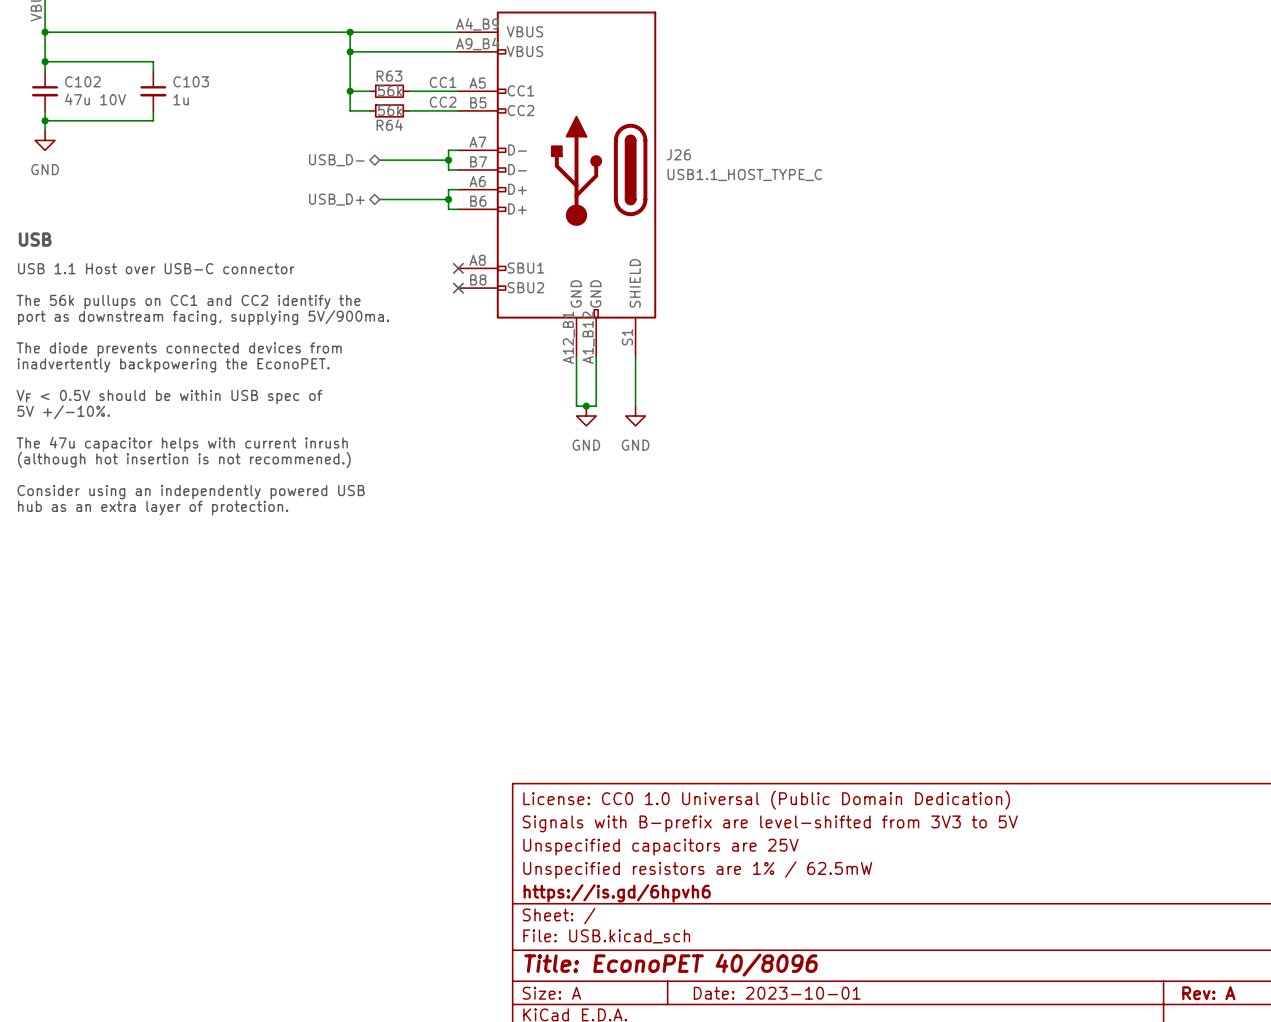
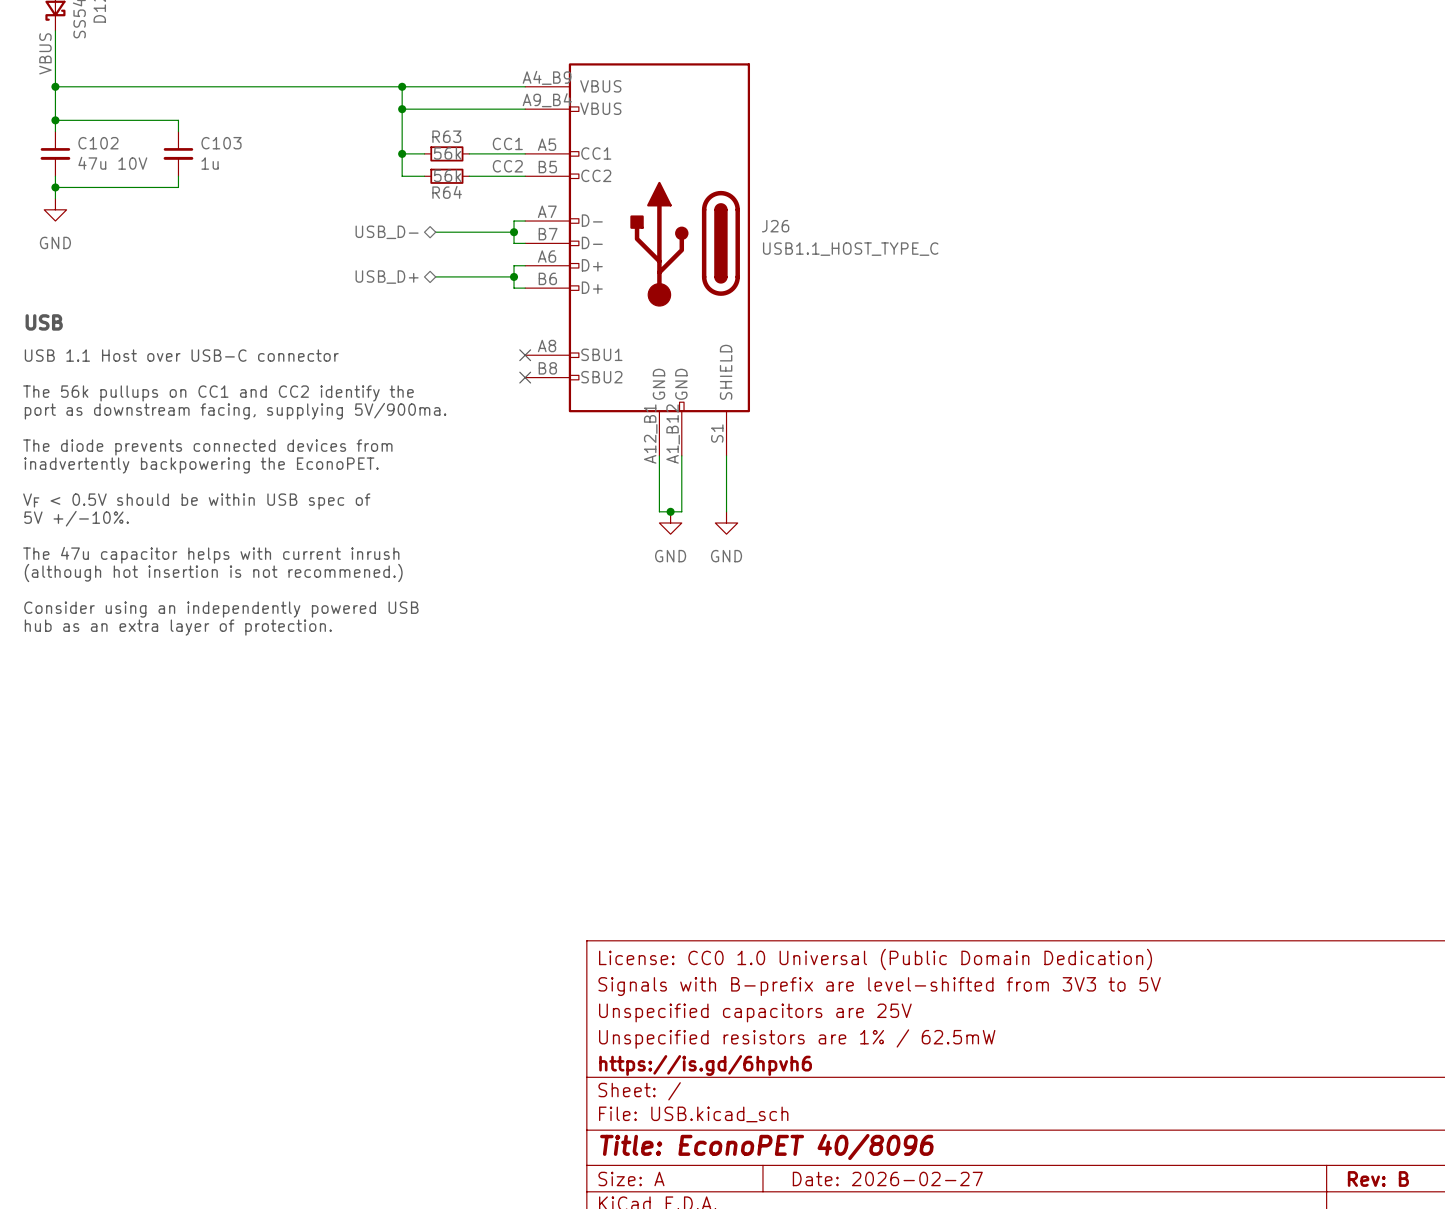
title block: Date: 2023-10-01 (777, 993) -> Date: 2026-02-27 (887, 1178)
title block: Rev: A (1208, 993) -> Rev: B (1378, 1178)

